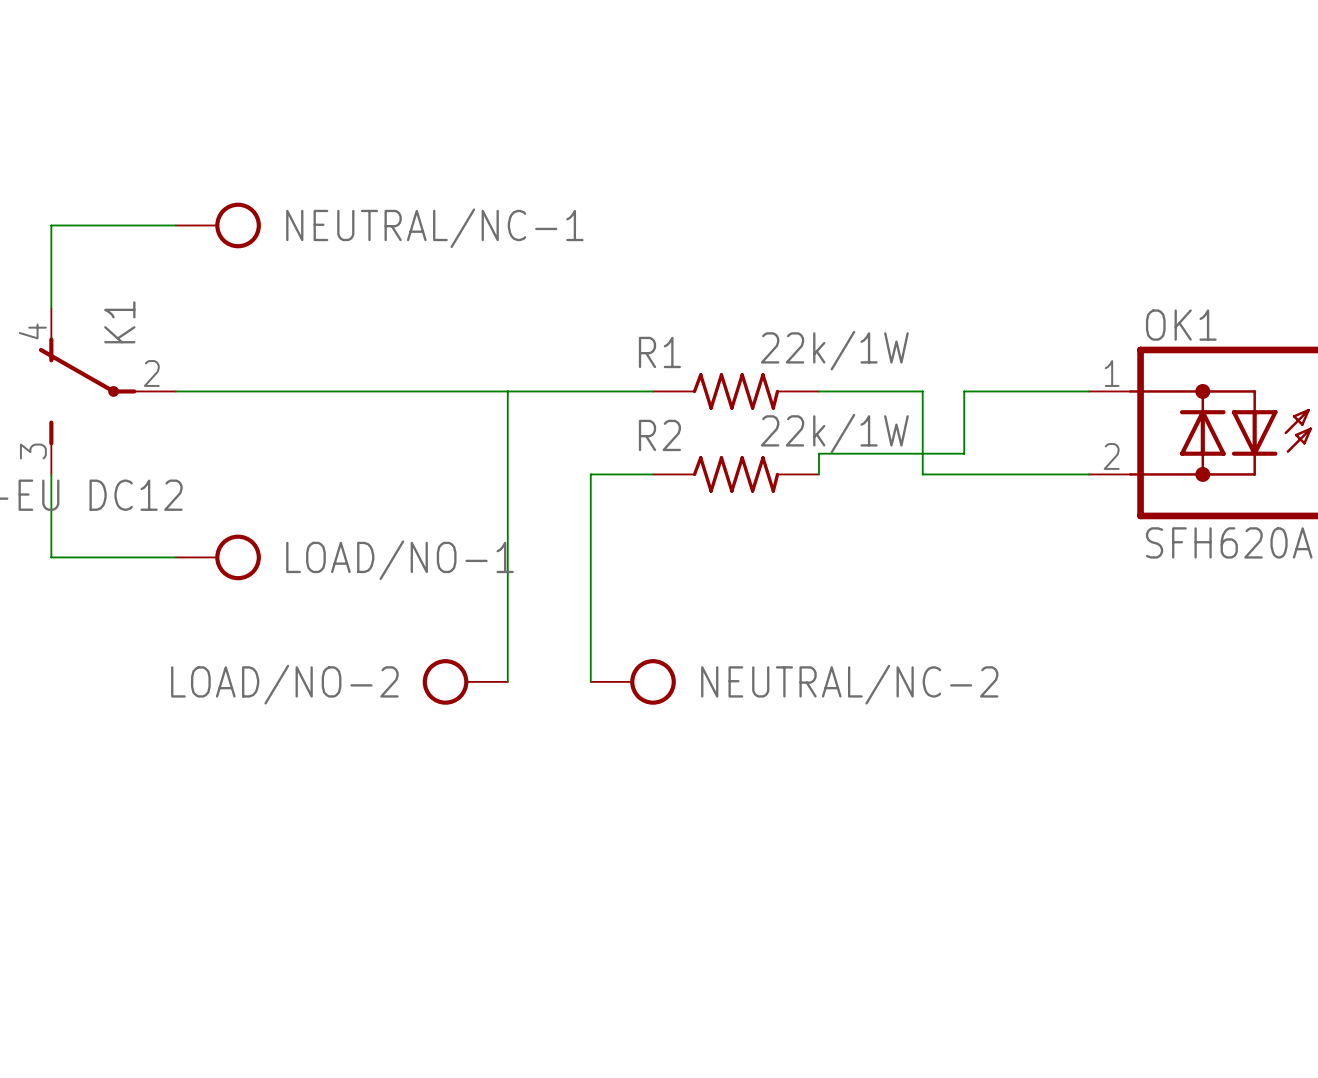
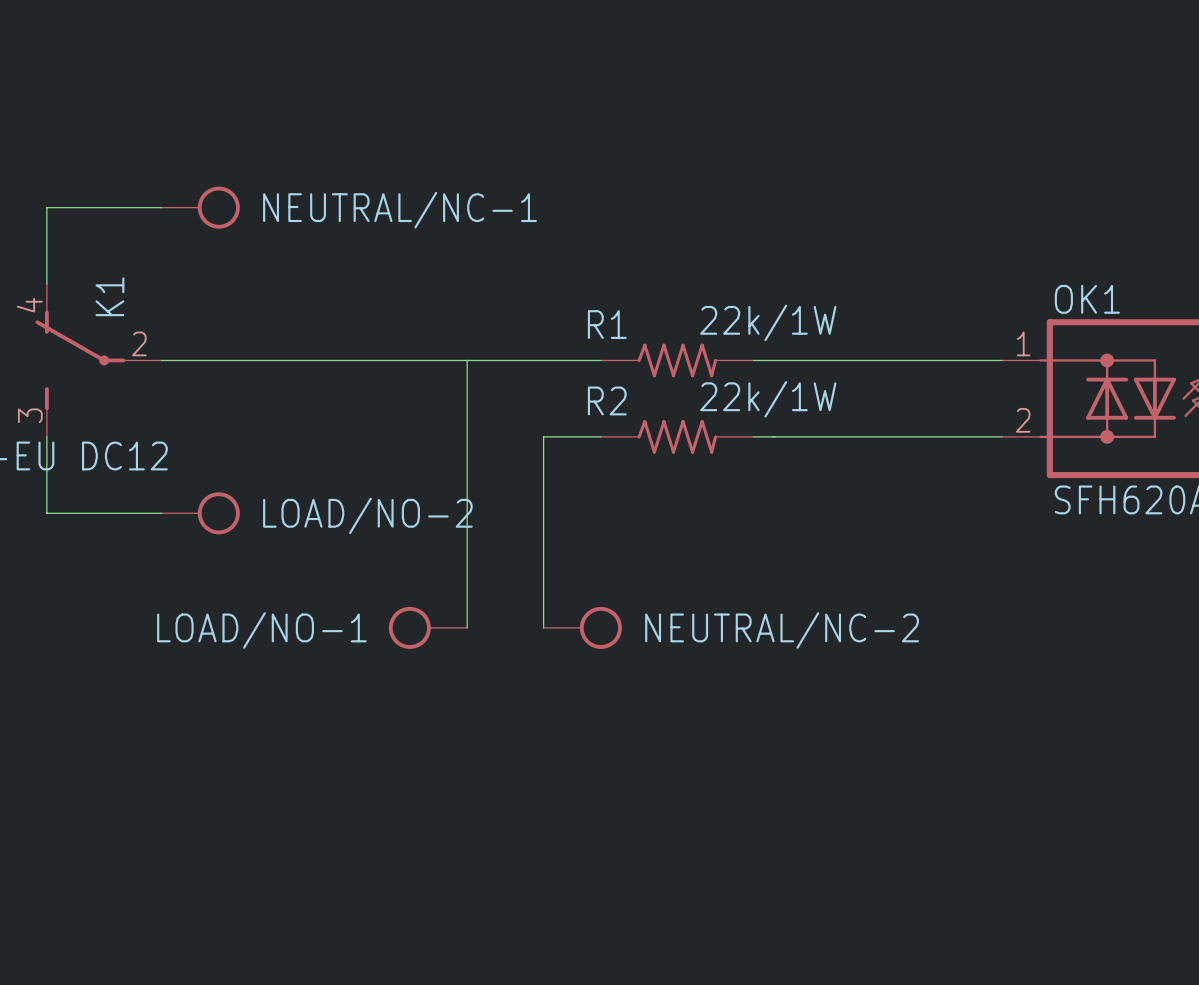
wire: (922, 391) (922, 474) -> (849, 360) (887, 360)
wire: (964, 391) (964, 453) (818, 453) (818, 474) -> (849, 436) (753, 436)
LOAD/NO-1 name: LOAD/NO-1 (399, 560) -> LOAD/NO-2 (367, 515)
LOAD/NO-2 name: LOAD/NO-2 (284, 684) -> LOAD/NO-1 (261, 630)

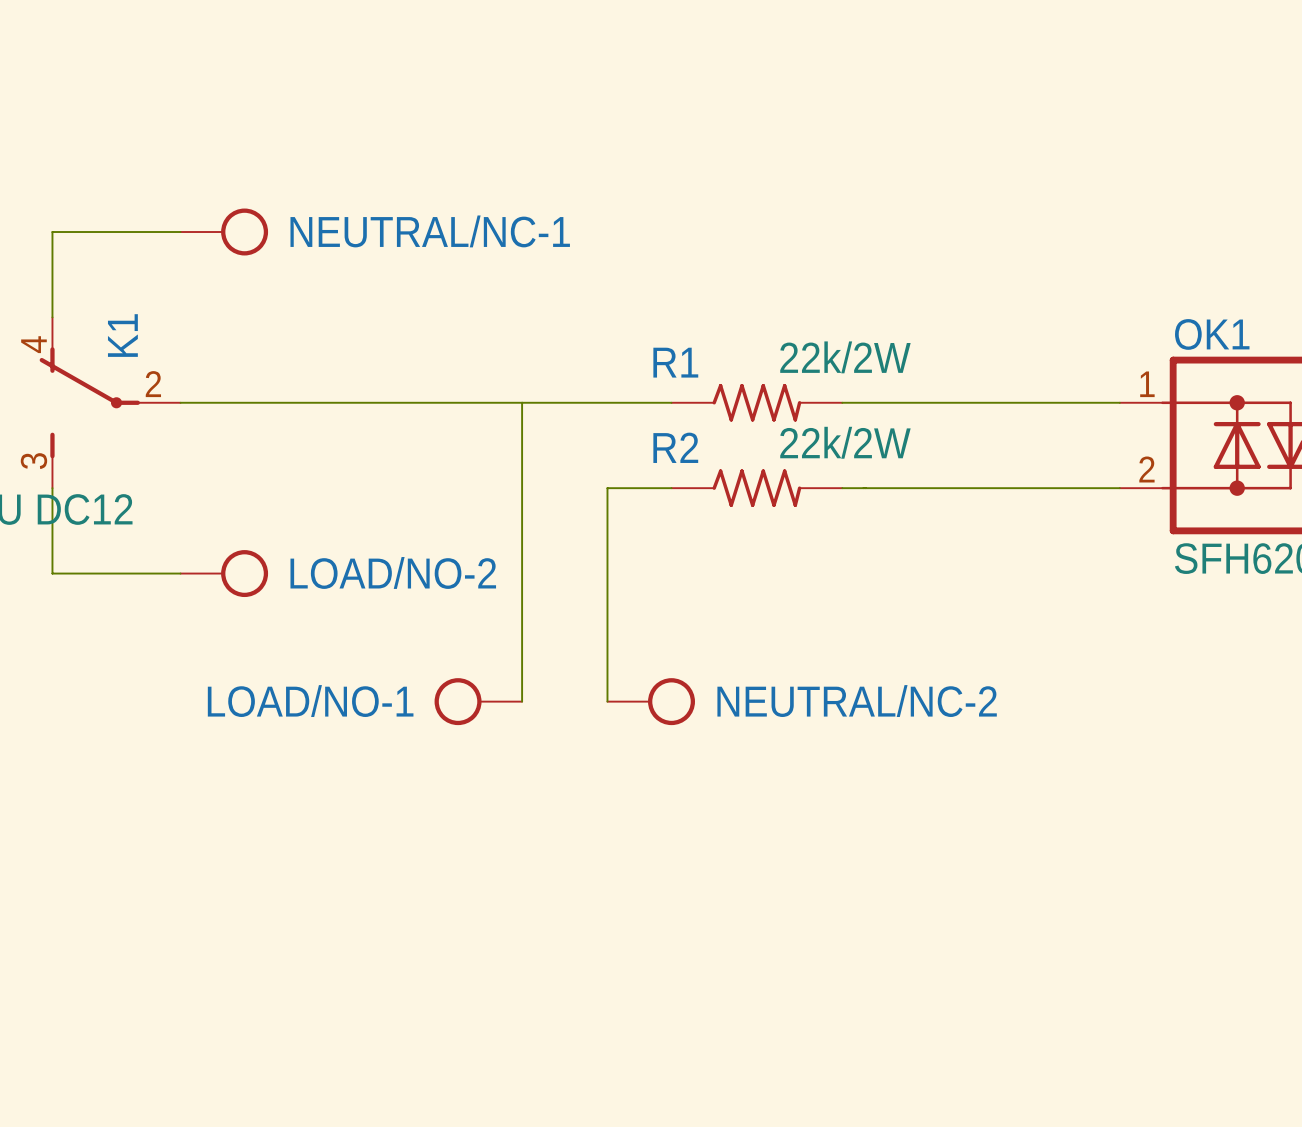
R1 value: 22k/1W (768, 322) -> 22k/2W (845, 357)
R2 value: 22k/1W (768, 399) -> 22k/2W (845, 442)

